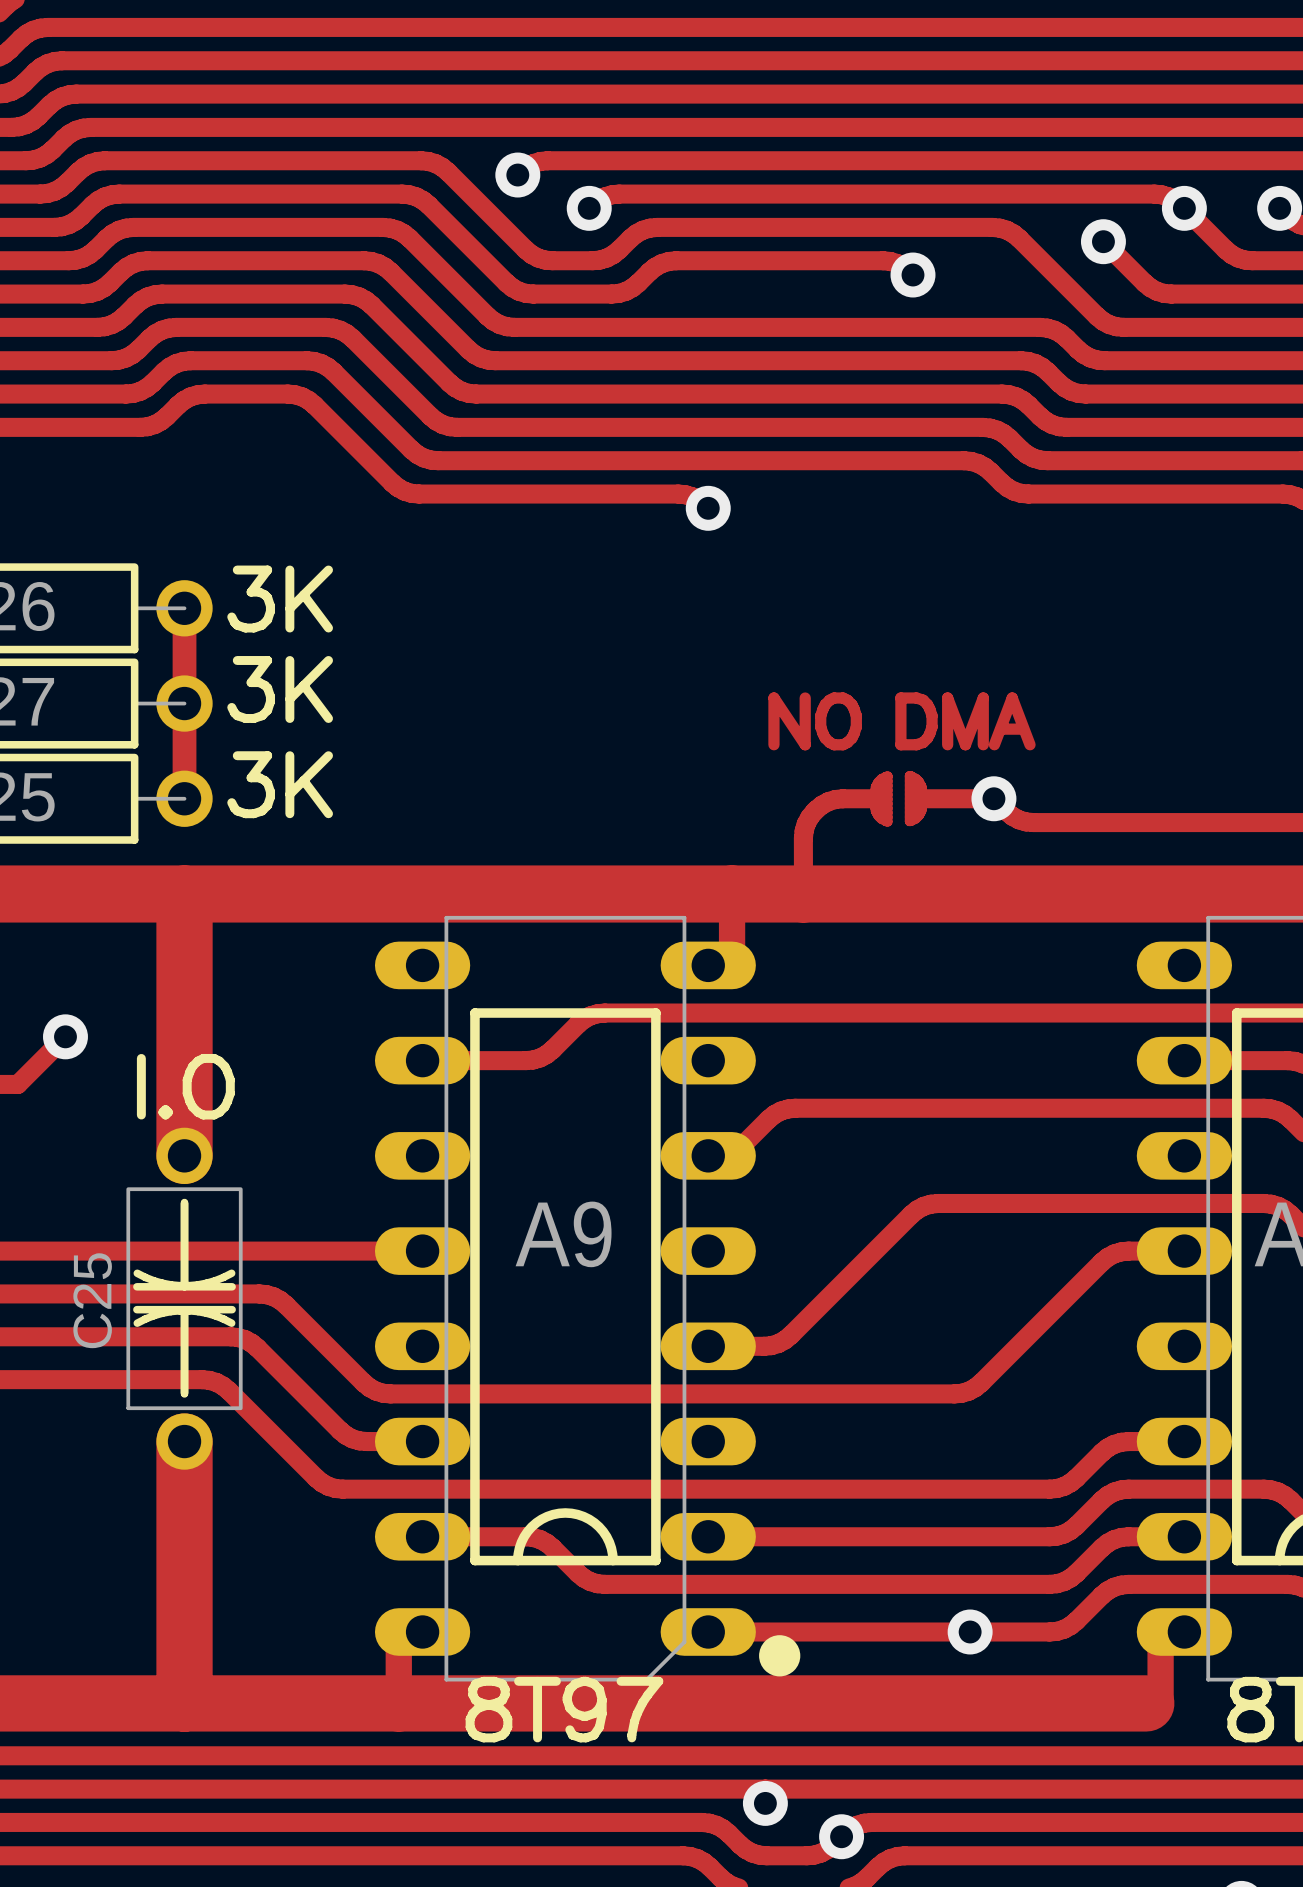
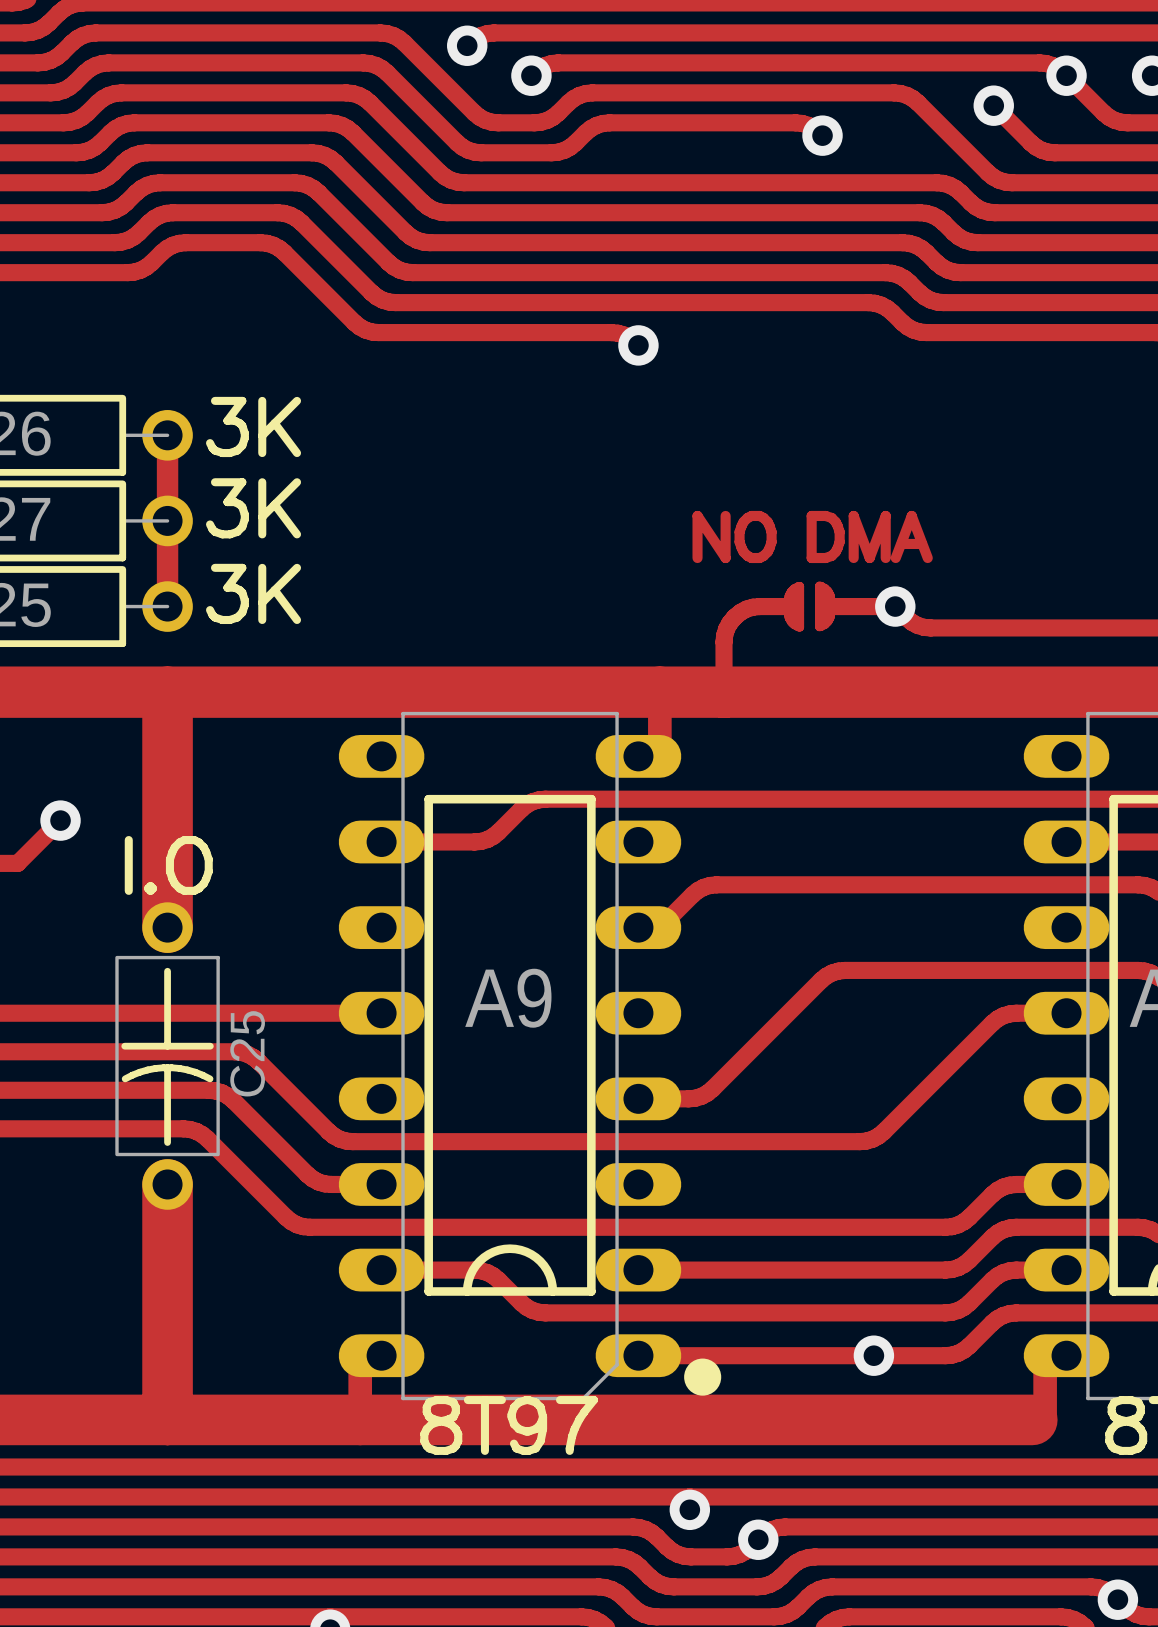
line: (136, 1286) (232, 1286) -> none
C25 rotation: 0° (184, 1298) -> 180° (167, 1056)
line: (137, 1323) (153, 1315) (179, 1310) (206, 1313) (231, 1323) -> none

